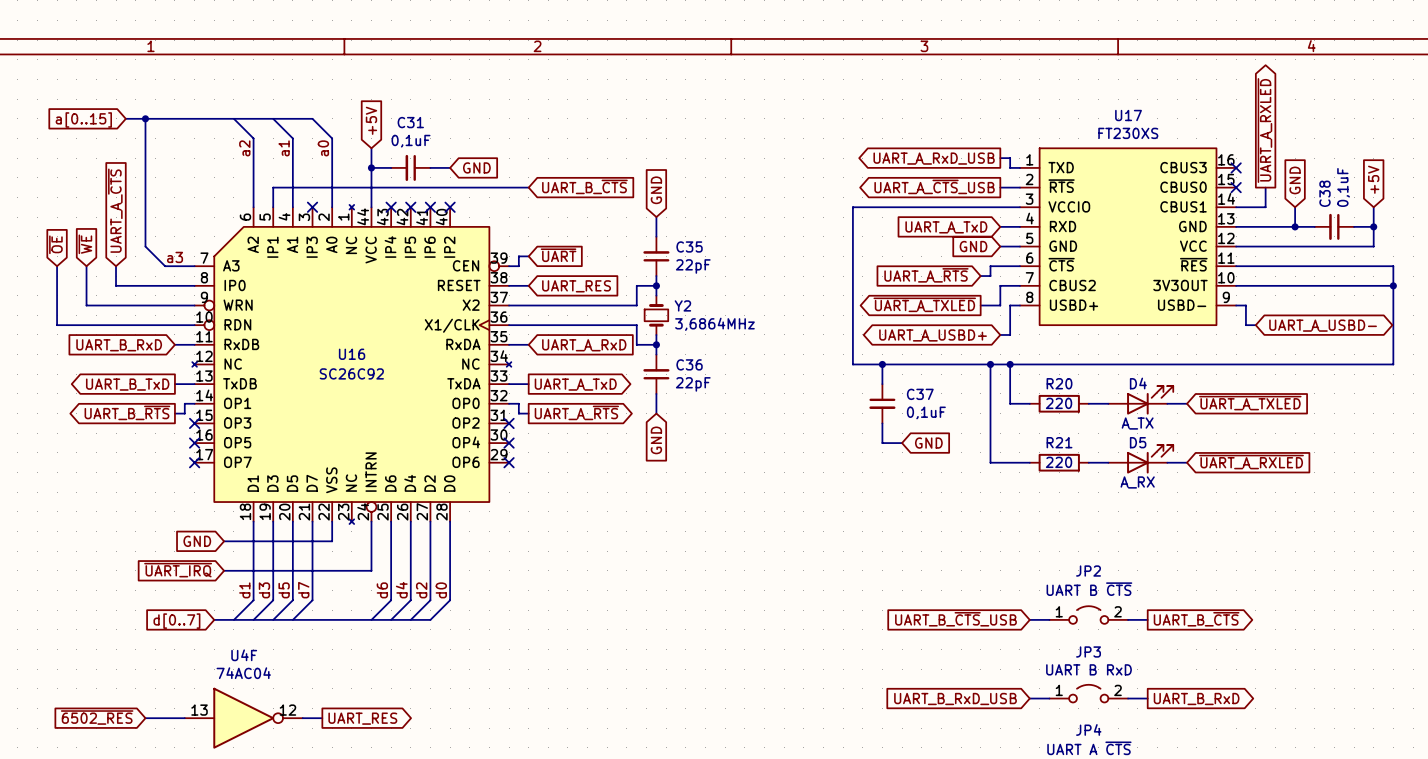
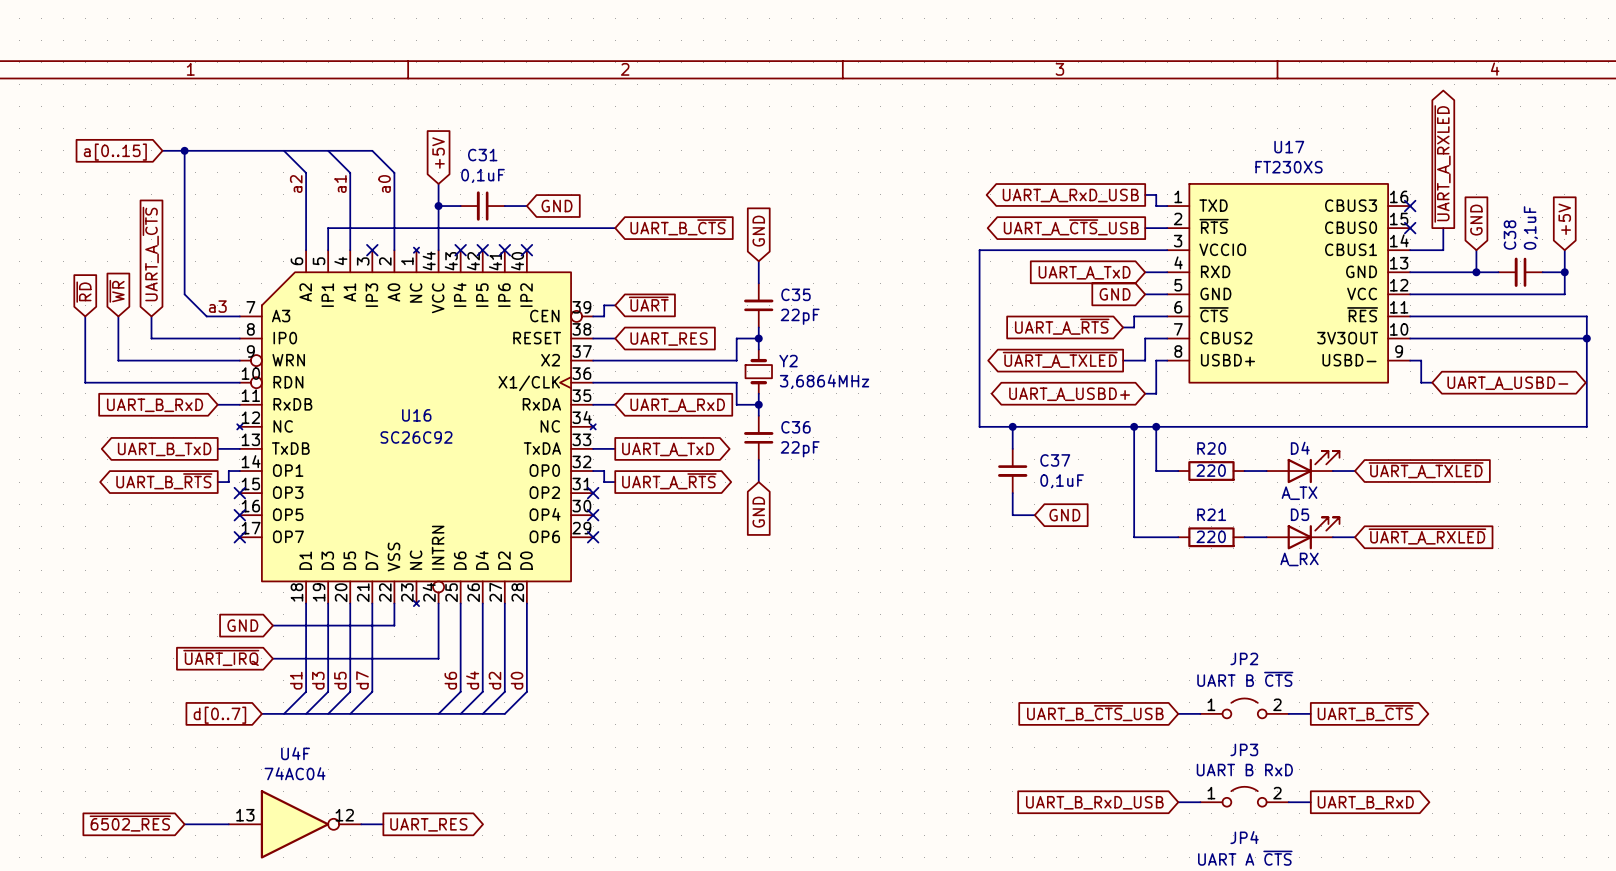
global label: ~{OE} (55, 244) -> ~{RD} (83, 292)
global label: ~{WE} (85, 244) -> ~{WR} (117, 291)

